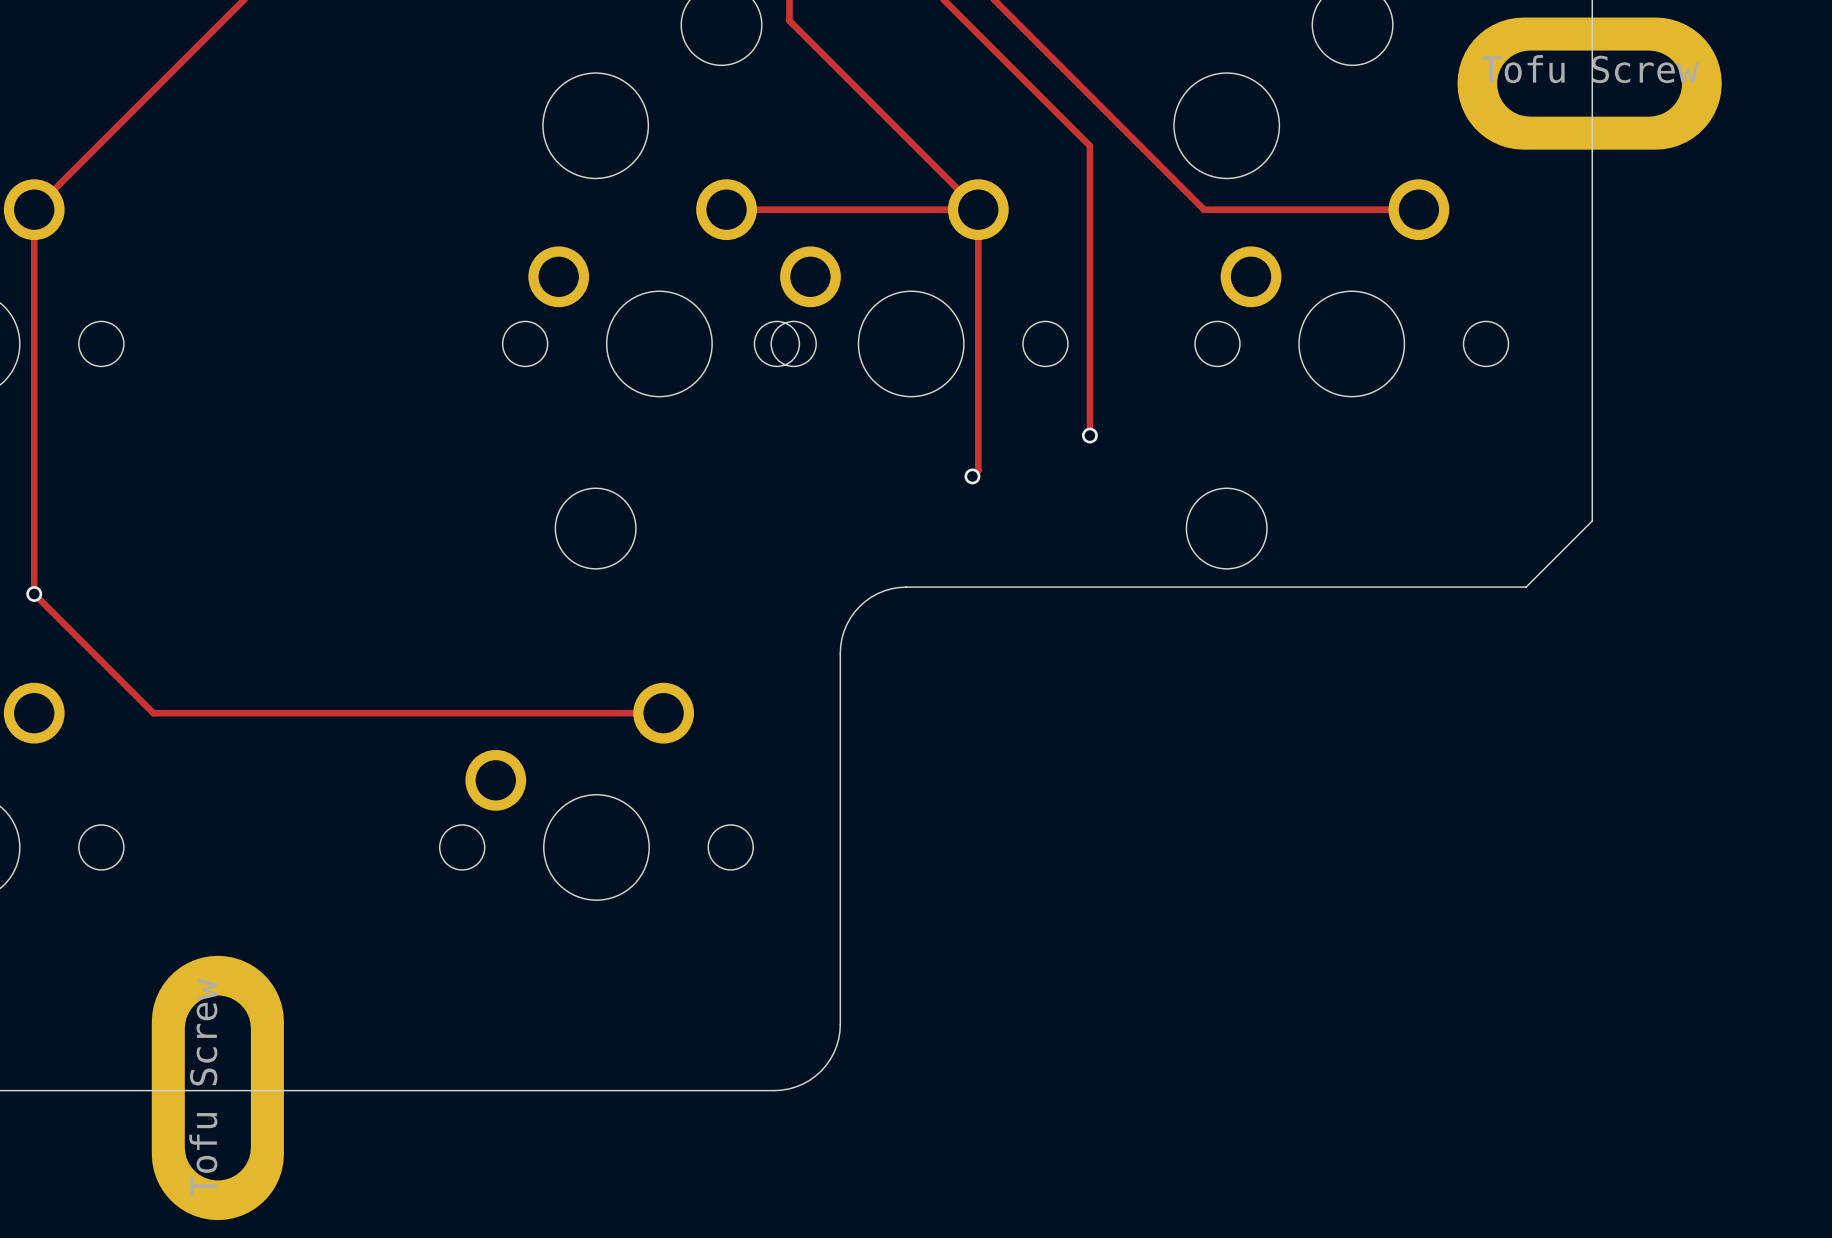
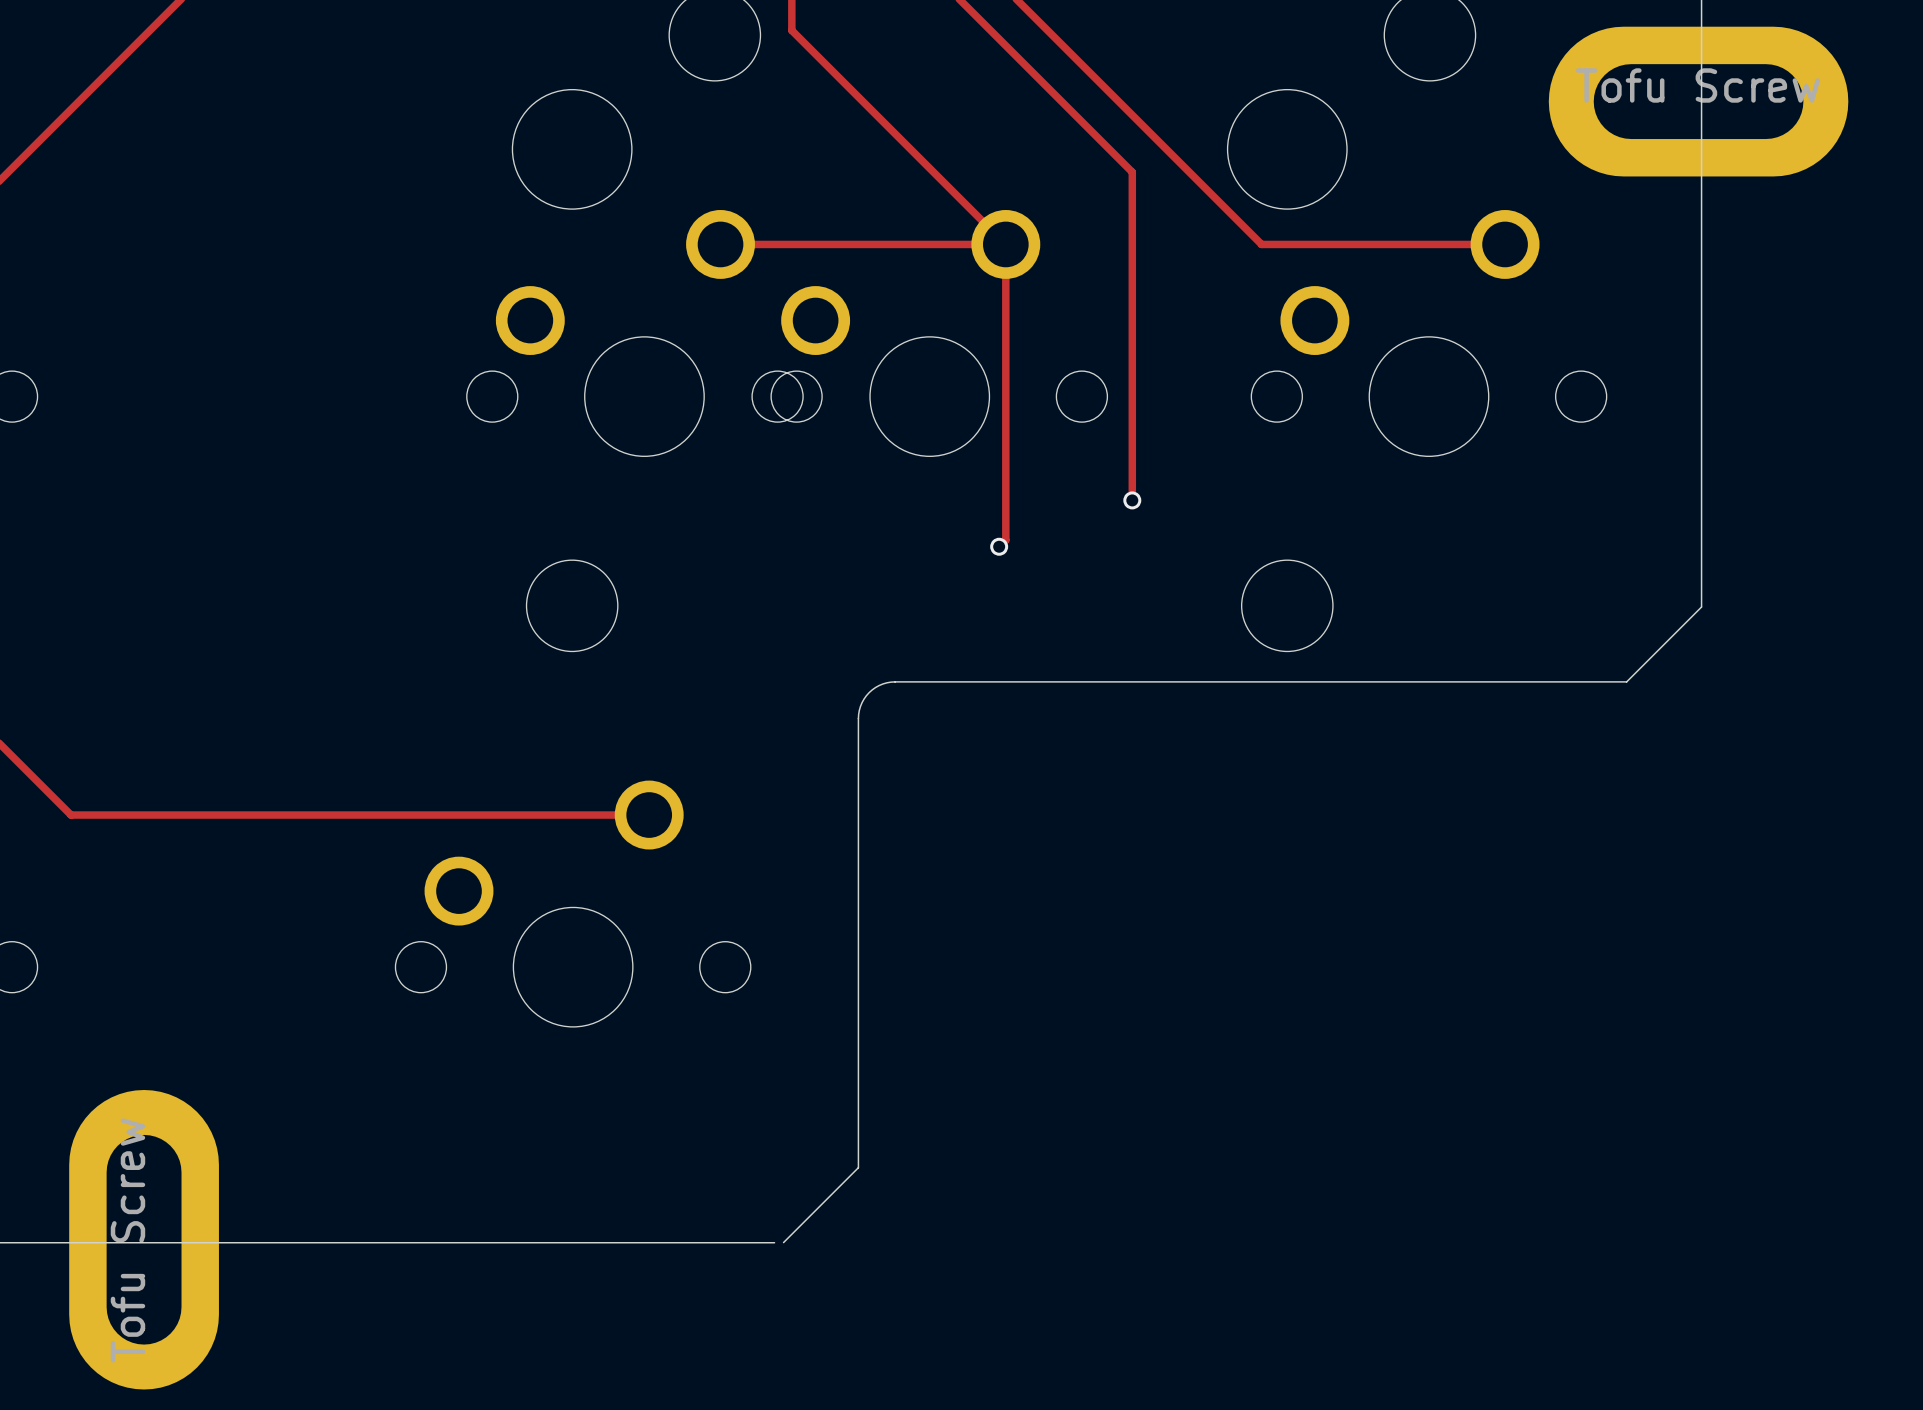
board edge: (1592, 521) (1526, 587) (906, 587) (891, 588) (871, 597) (859, 606) (850, 618) (844, 631) (840, 645) (840, 1024) (838, 1039) (830, 1059) (815, 1076) (796, 1086) (774, 1090) -> (1701, 597) (1701, 607) (1626, 681) (895, 681) (875, 687) (862, 702) (858, 718) (858, 1167) (783, 1242)

